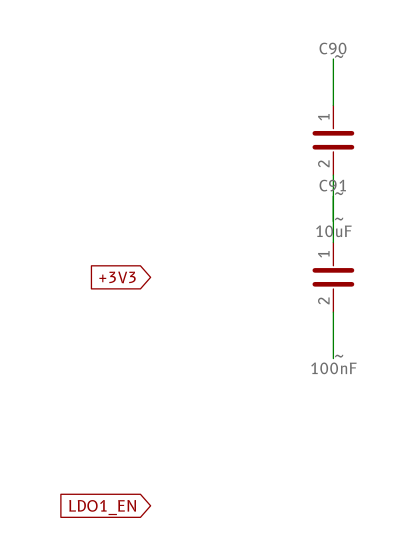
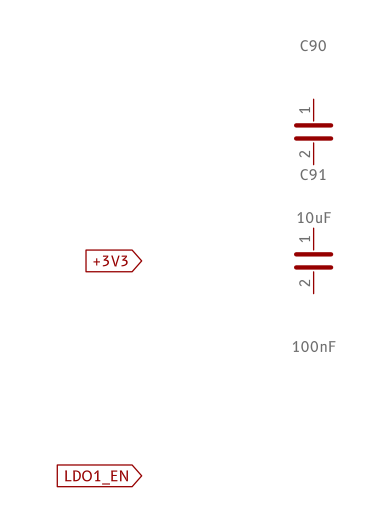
label: ~ (339, 56) -> none
wire: (333, 59) (333, 105) -> none
wire: (333, 175) (333, 242) -> none
label: ~ (339, 193) -> none
label: ~ (339, 219) -> none
wire: (333, 312) (333, 358) -> none
label: ~ (339, 356) -> none

